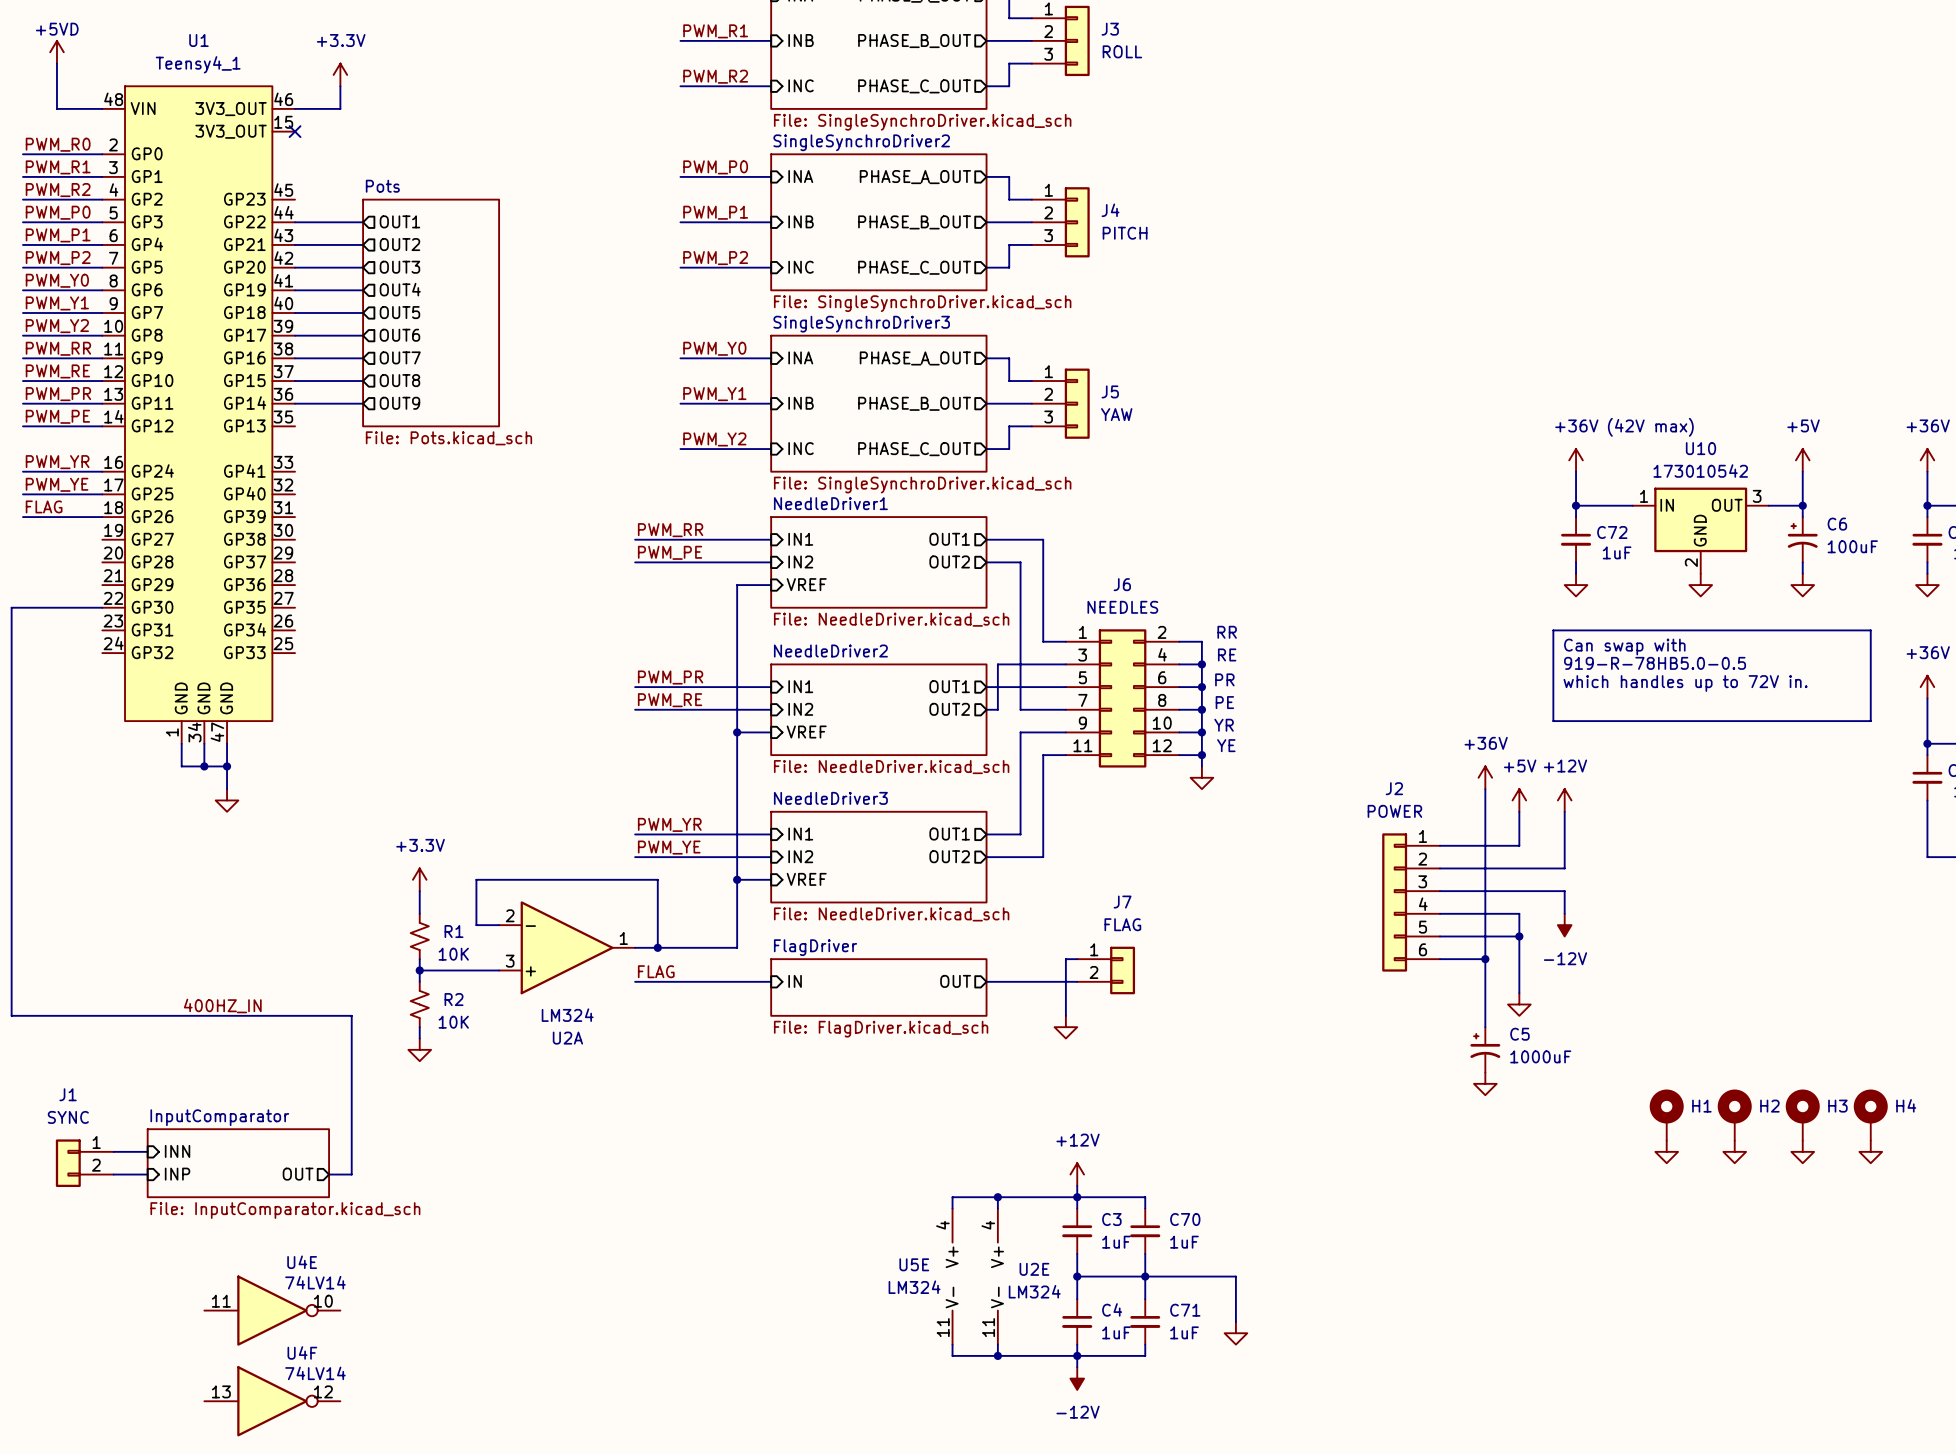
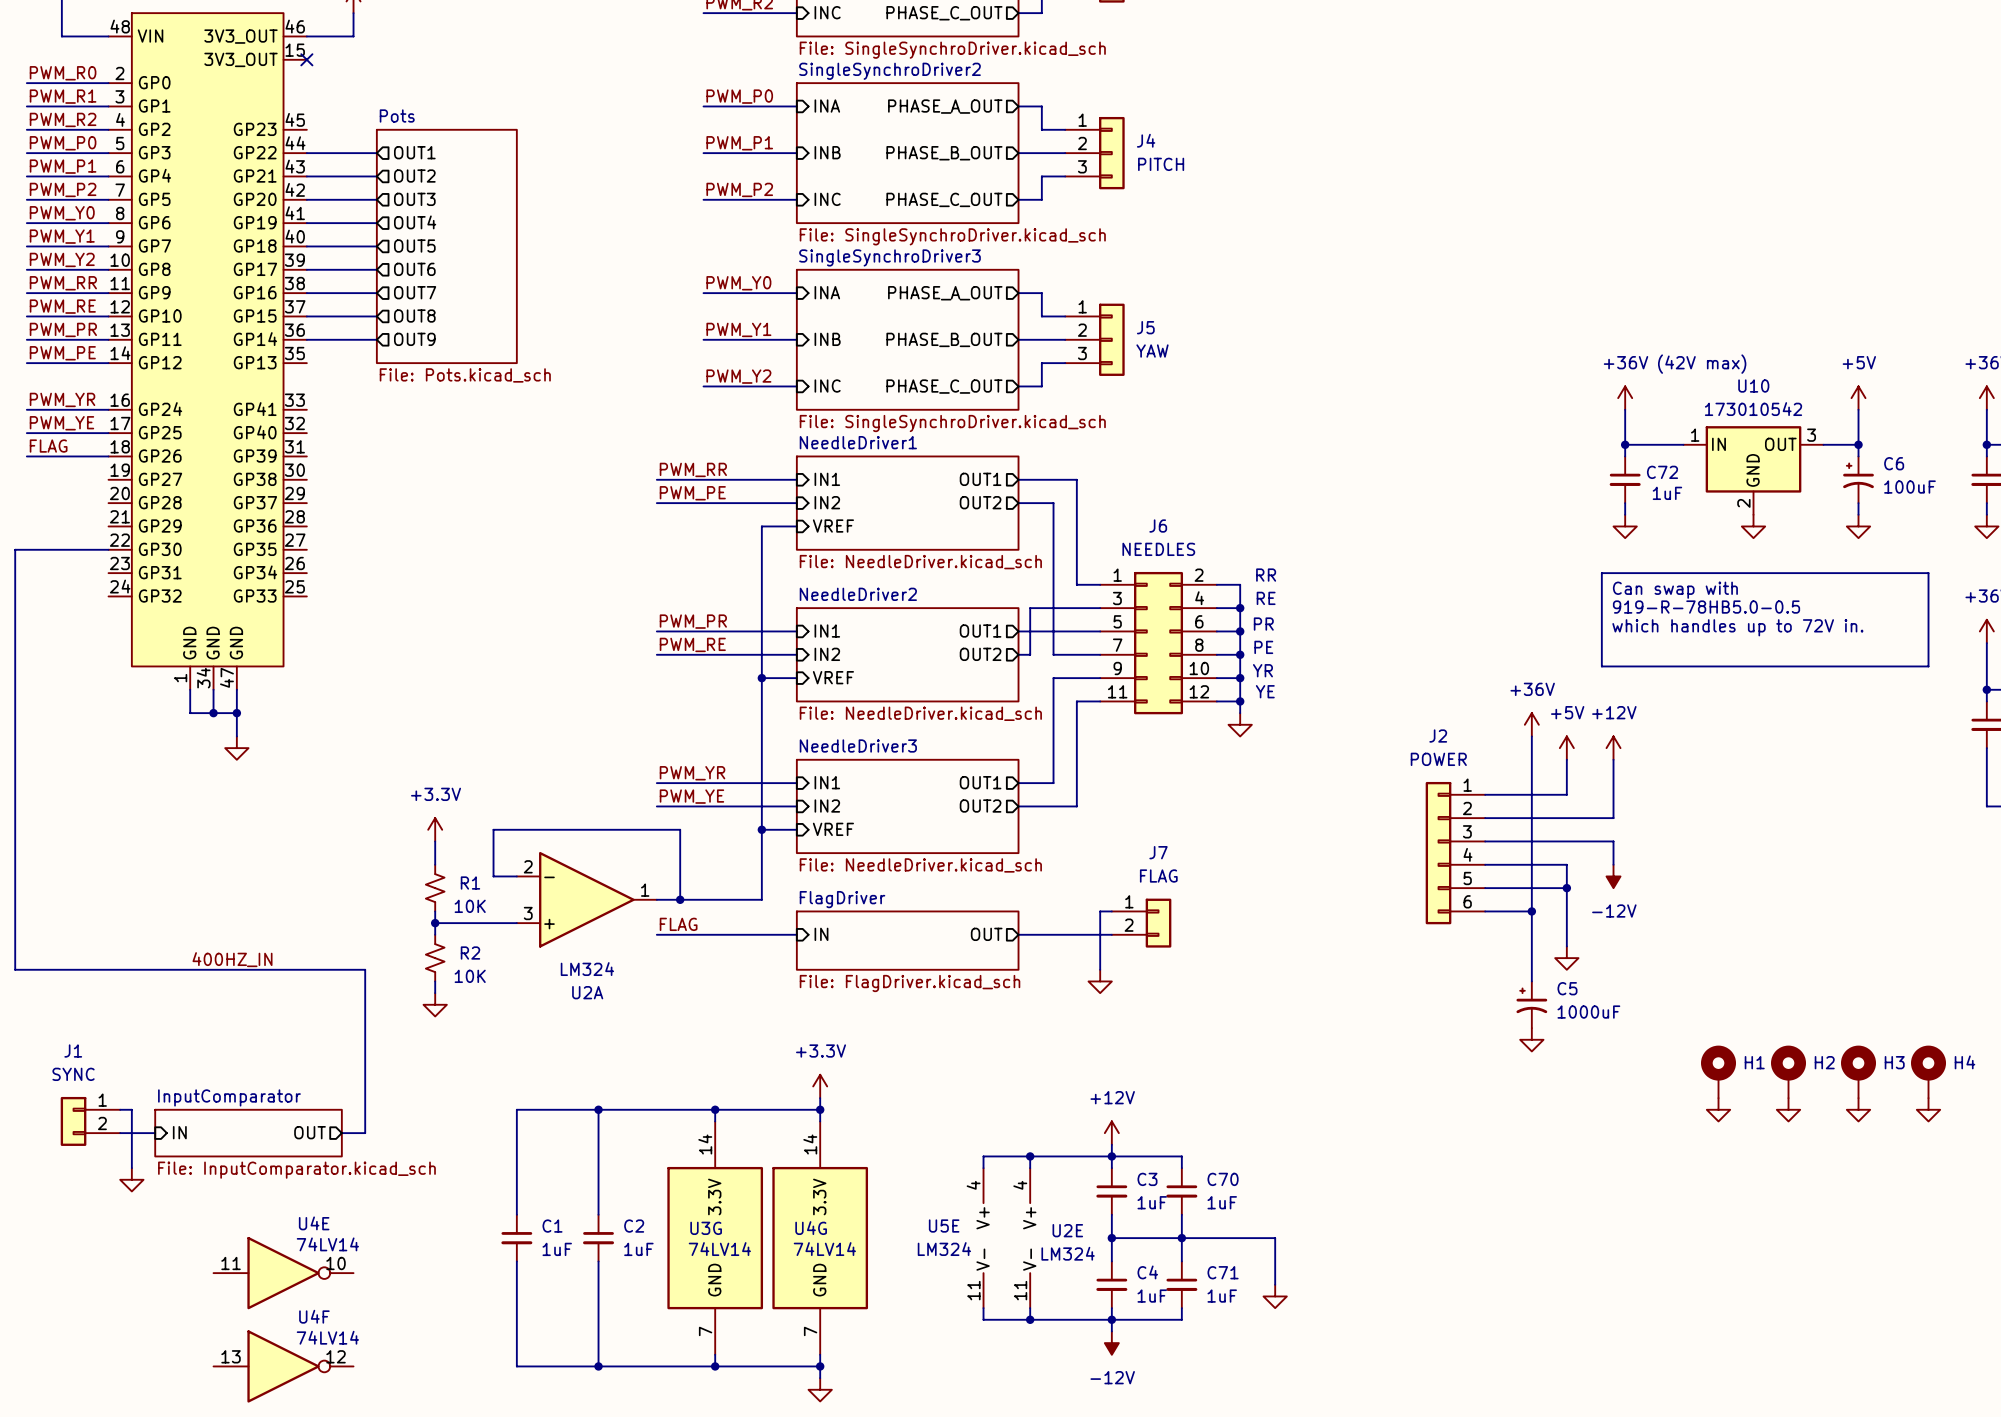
power symbol: none -> +3.3V (820, 1086)
wire: none -> (820, 1098) (820, 1121)
wire: (125, 1151) (147, 1151) -> (131, 1109) (131, 1168)
sheet pin: INN (177, 1151) -> none
wire: none -> (598, 1109) (598, 1214)
junction: none -> (598, 1109)
wire: none -> (715, 1109) (715, 1121)
junction: none -> (715, 1109)
wire: none -> (820, 1109) (516, 1109) (516, 1214)
junction: none -> (820, 1109)
sheet InputComparator: File: InputComparator.kicad_sch (238, 1163) -> none
sheet pin: INP (177, 1174) -> IN (179, 1132)
sheet InputComparator: none -> File: InputComparator.kicad_sch (248, 1133)
power symbol: none -> (131, 1179)
C1: none -> 1uF (516, 1238)
C2: none -> 1uF (598, 1238)
U3G: none -> 74LV14 (715, 1238)
U4G: none -> 74LV14 (820, 1238)
wire: none -> (516, 1261) (516, 1366) (820, 1366)
wire: none -> (598, 1261) (598, 1366)
wire: none -> (715, 1354) (715, 1366)
wire: none -> (820, 1354) (820, 1378)
junction: none -> (598, 1366)
junction: none -> (715, 1366)
junction: none -> (820, 1366)
power symbol: none -> (820, 1389)

